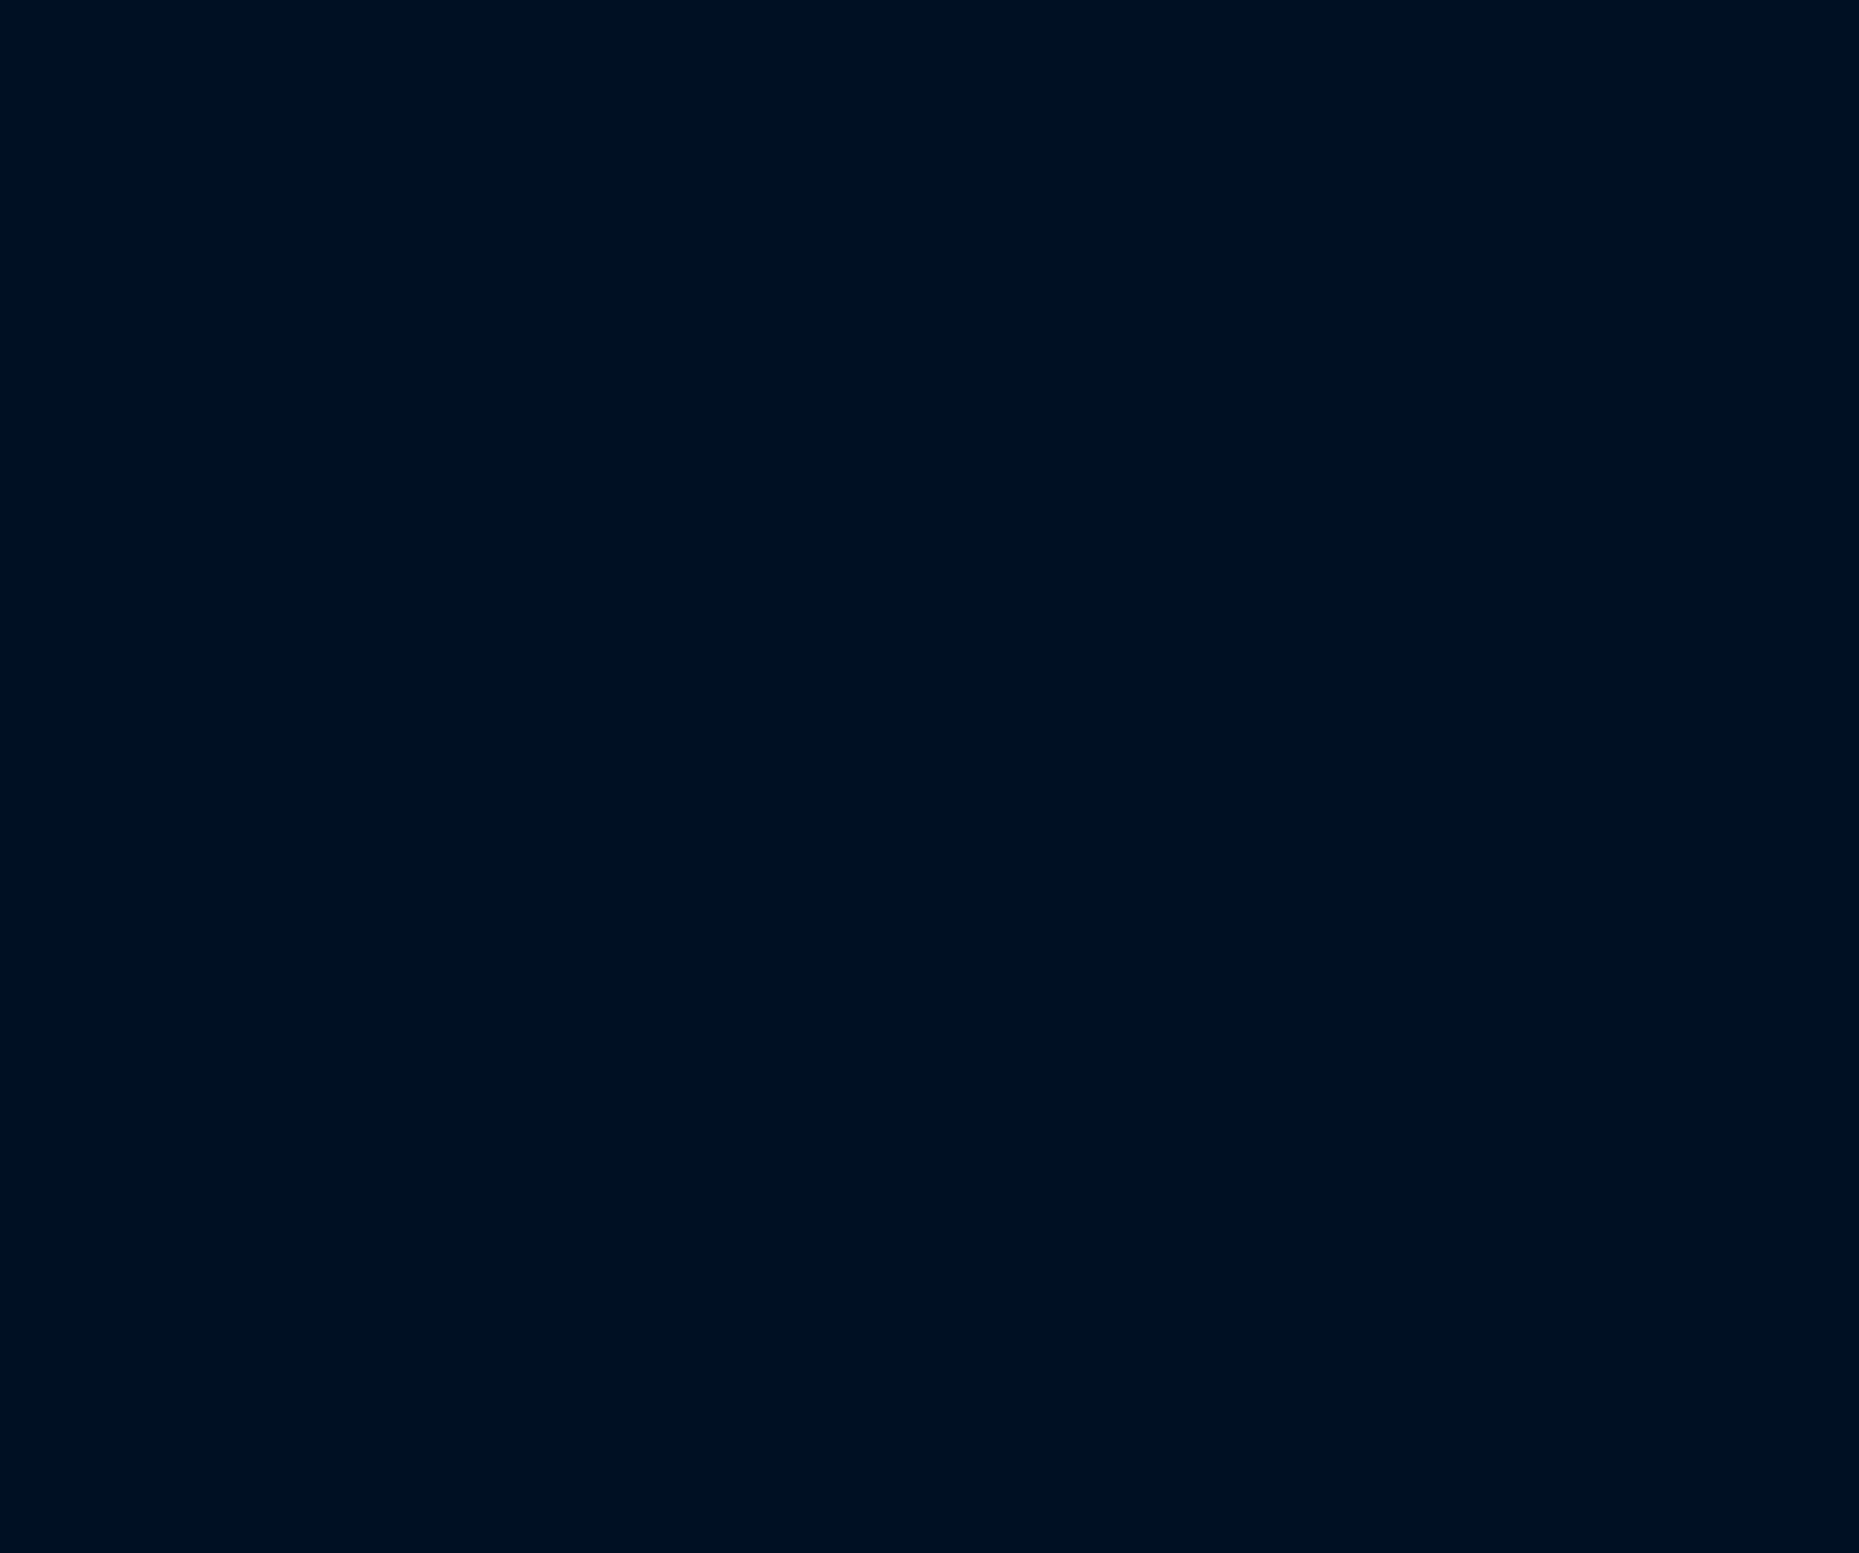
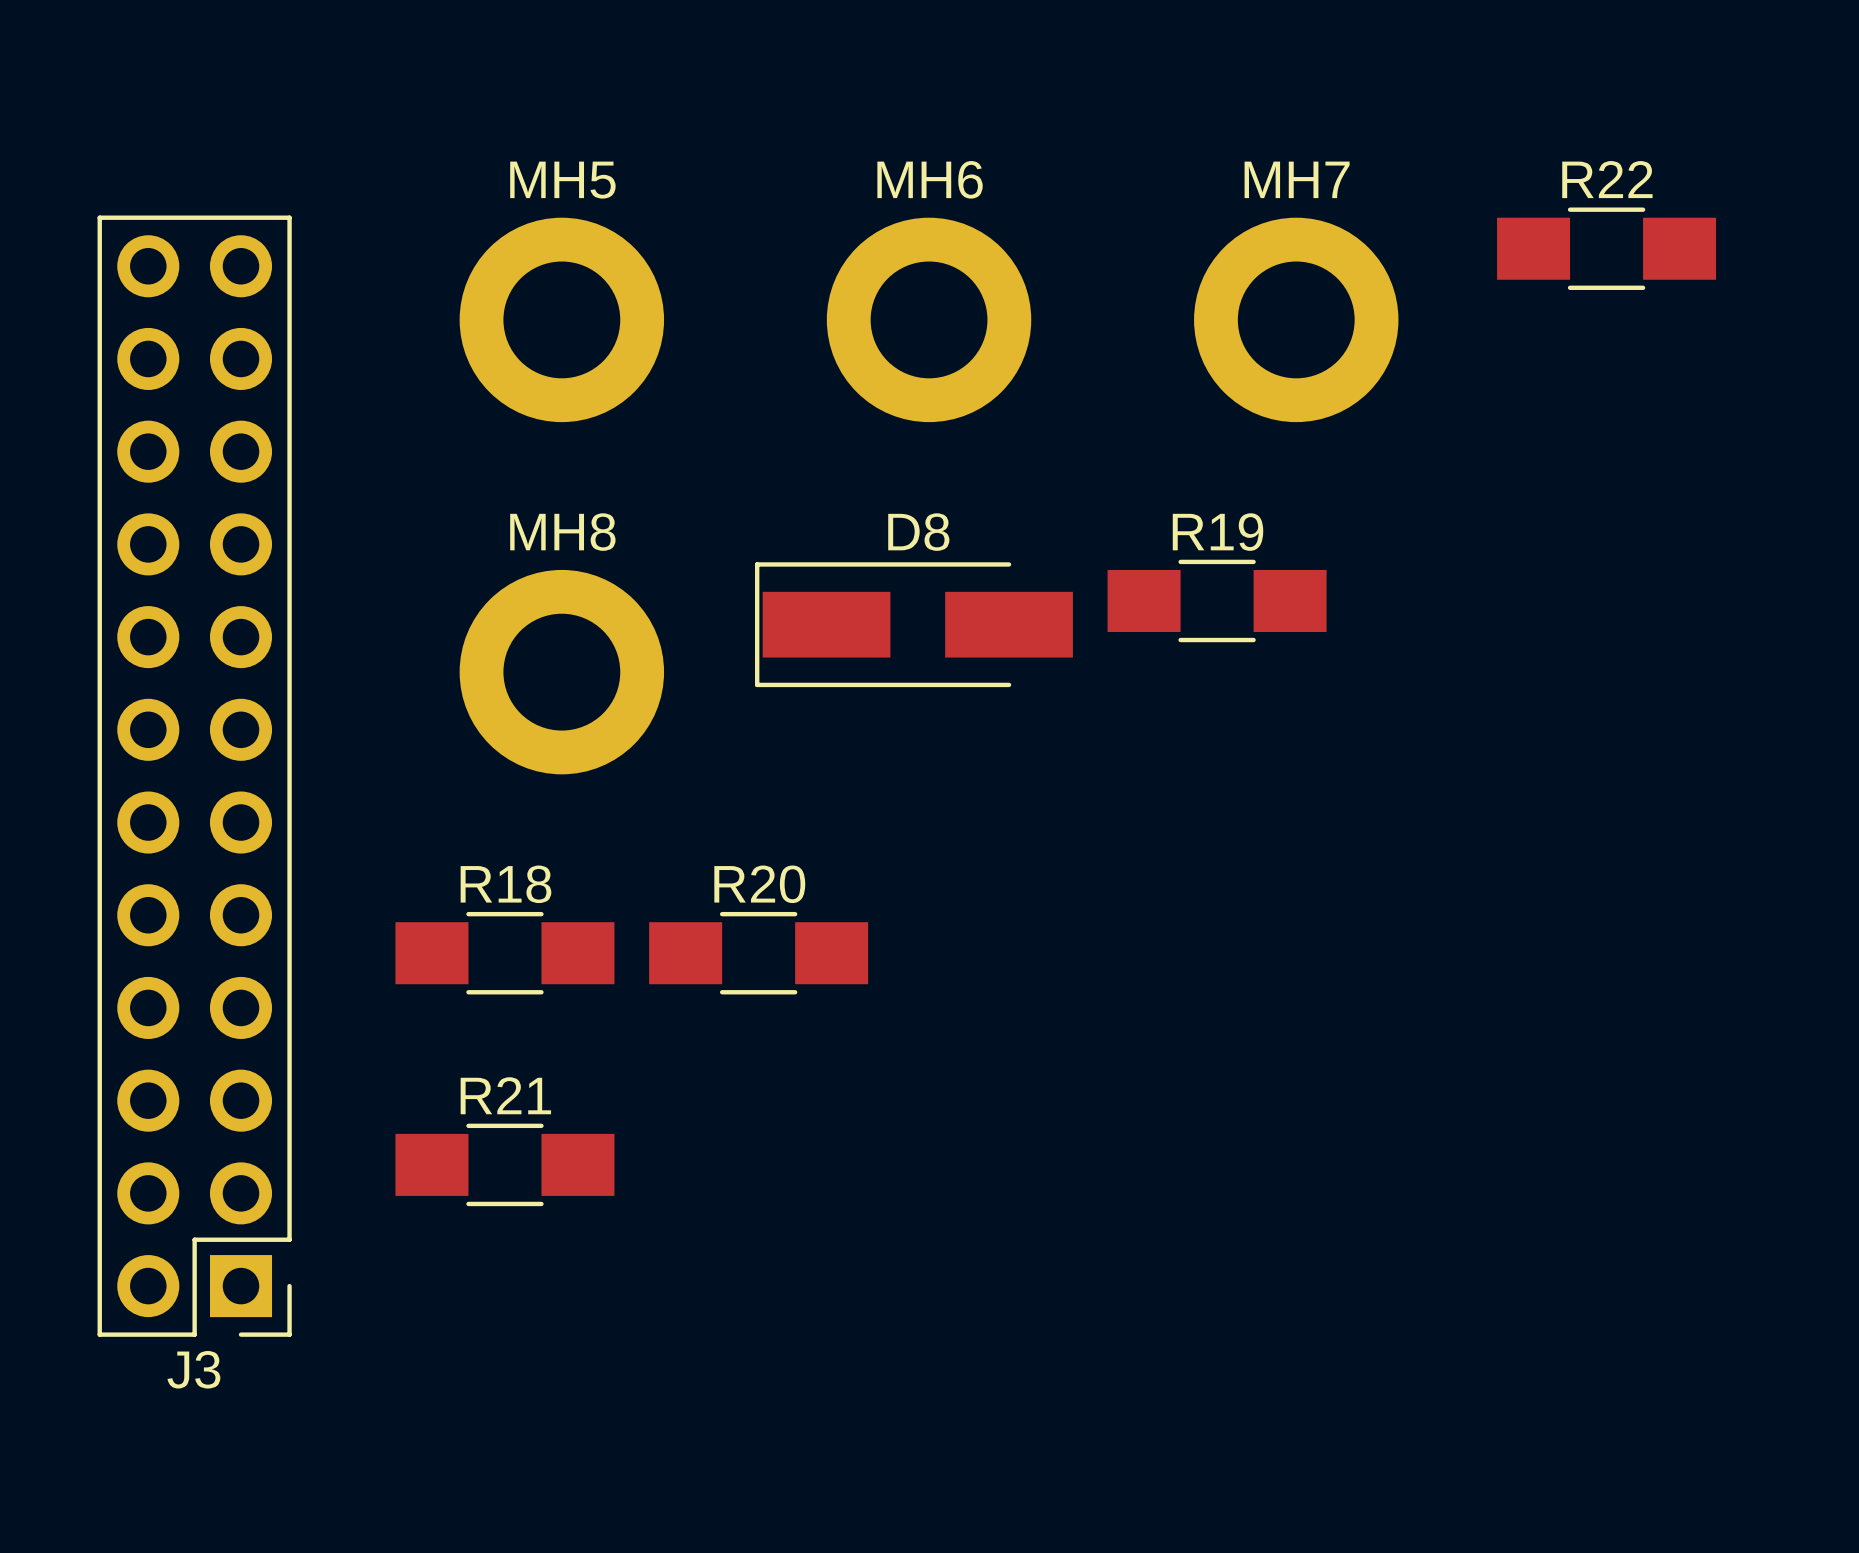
R22: none -> (1606, 248)
MH5: none -> (561, 319)
MH6: none -> (929, 319)
MH7: none -> (1296, 319)
R19: none -> (1217, 600)
D8: none -> (913, 624)
MH8: none -> (561, 672)
J3: none -> (194, 776)
R18: none -> (504, 953)
R20: none -> (758, 953)
R21: none -> (504, 1164)

